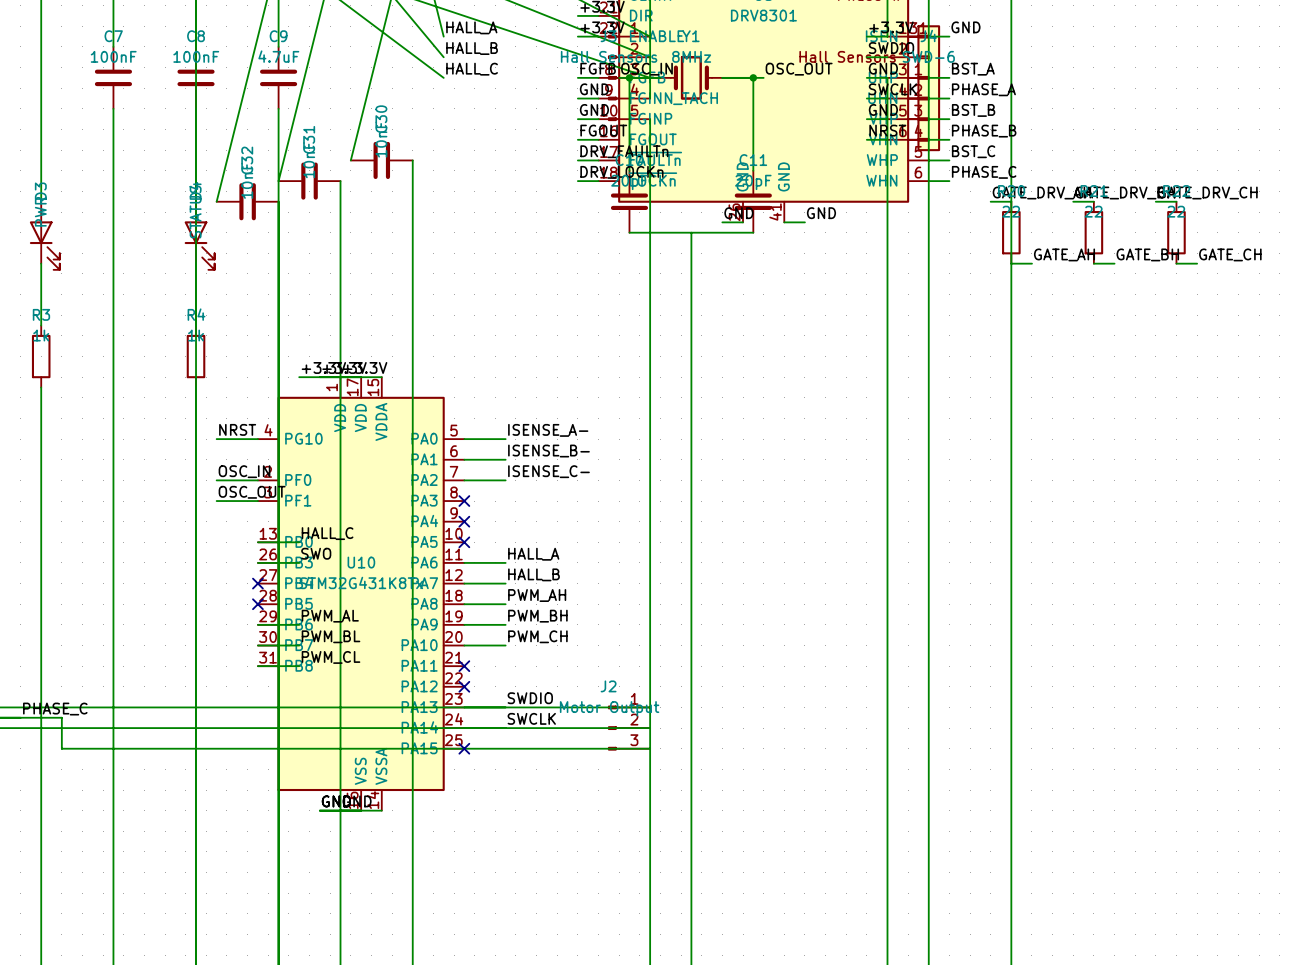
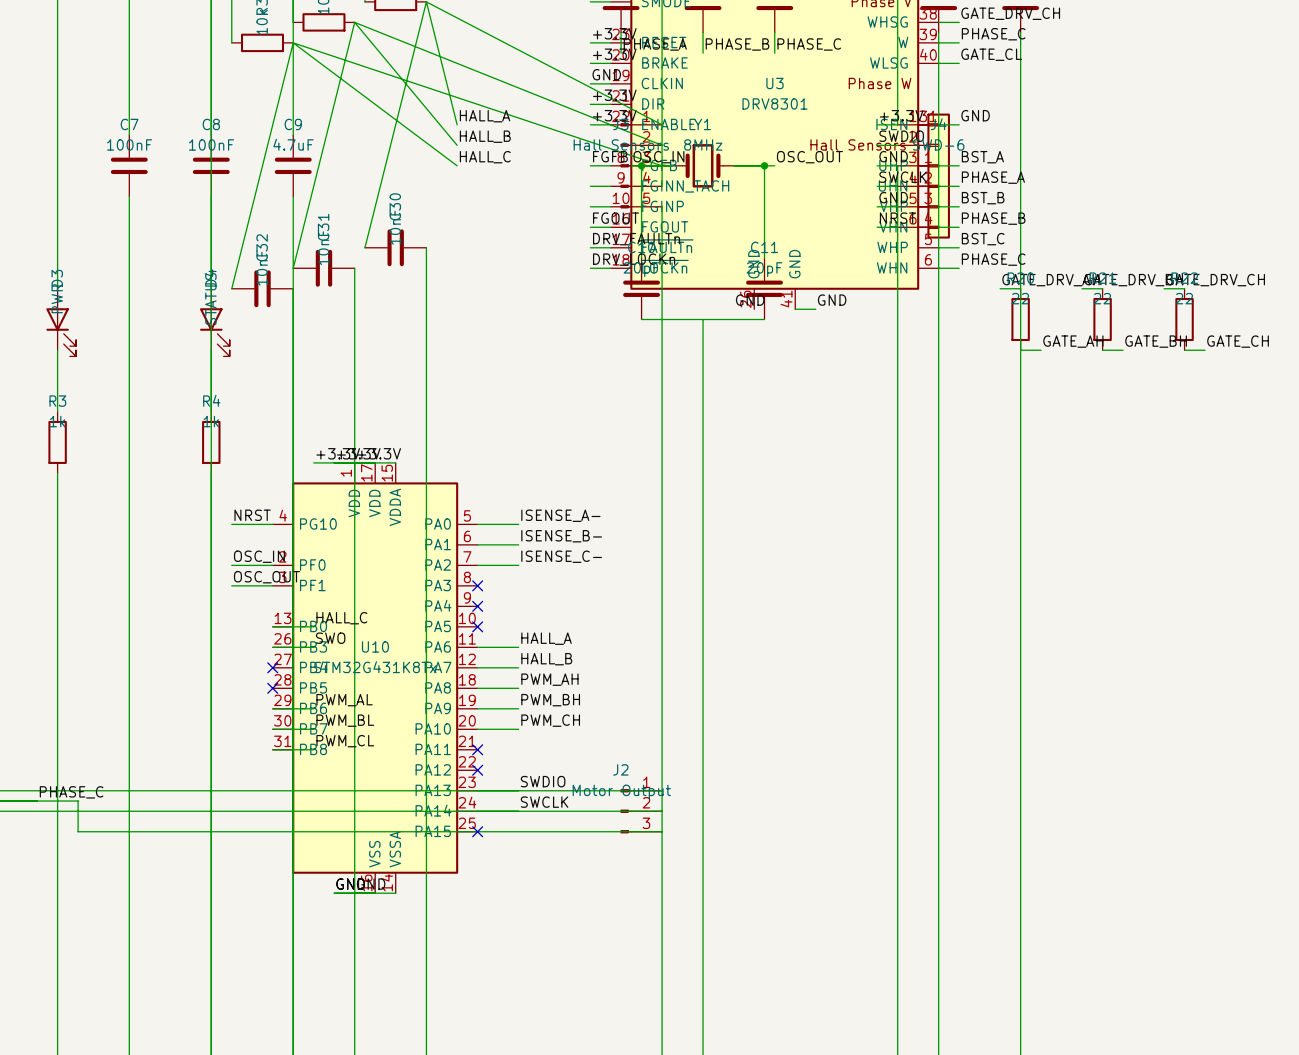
label: GND (594, 89) -> none
label: GND (594, 109) -> none
wire: (722, 222) (743, 222) -> none

